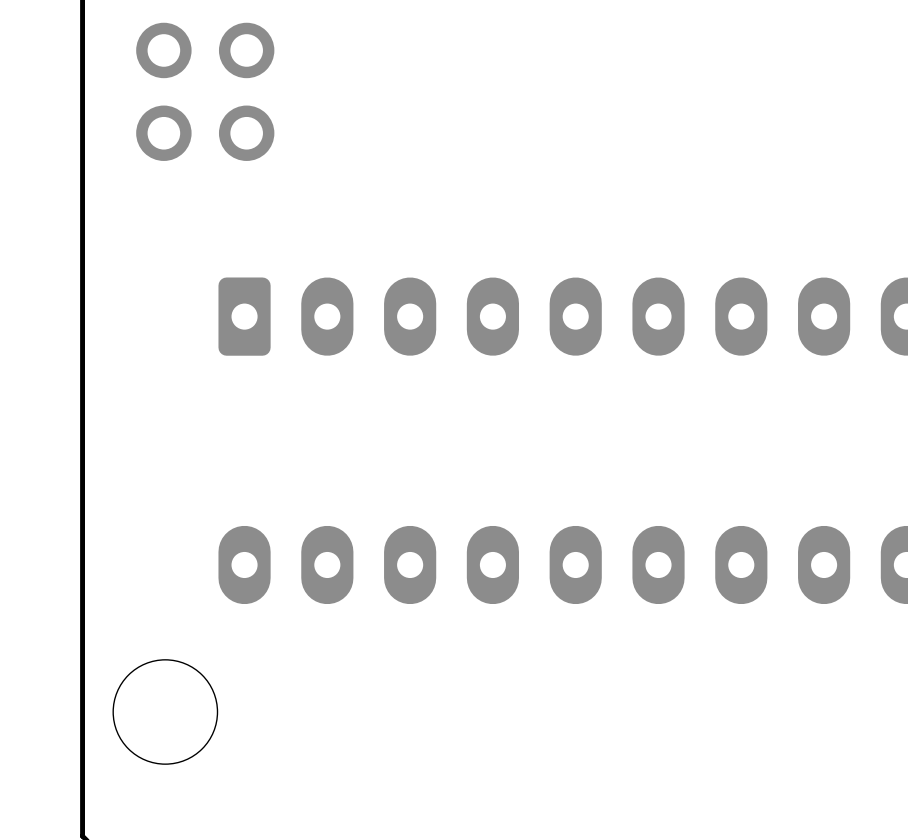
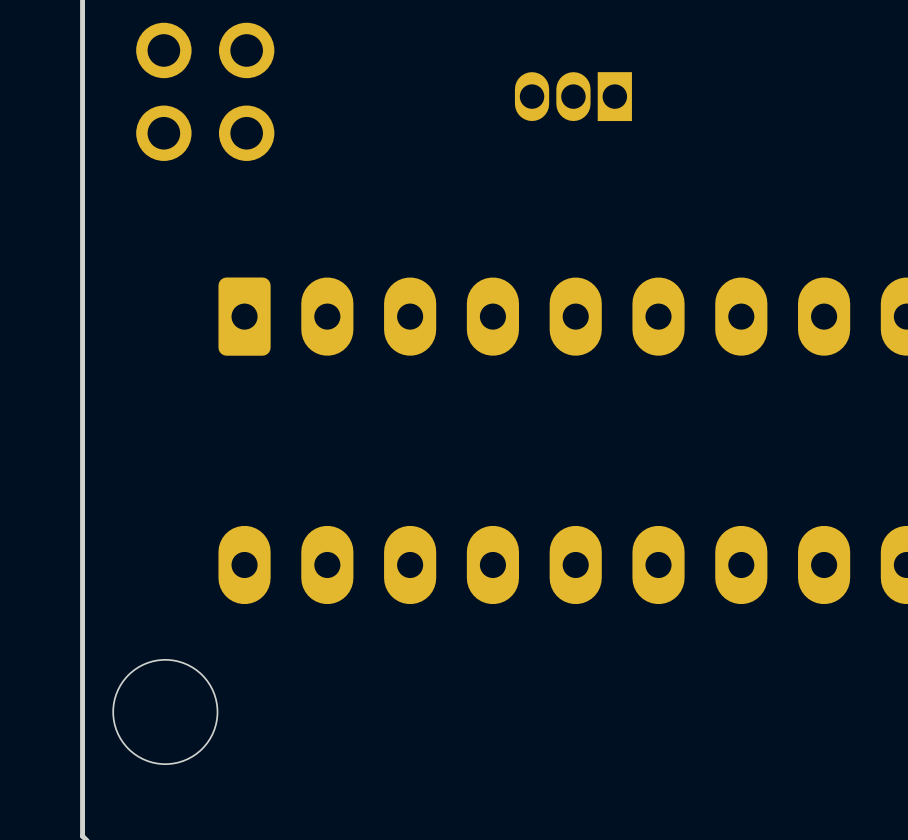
part: none -> (573, 96)

